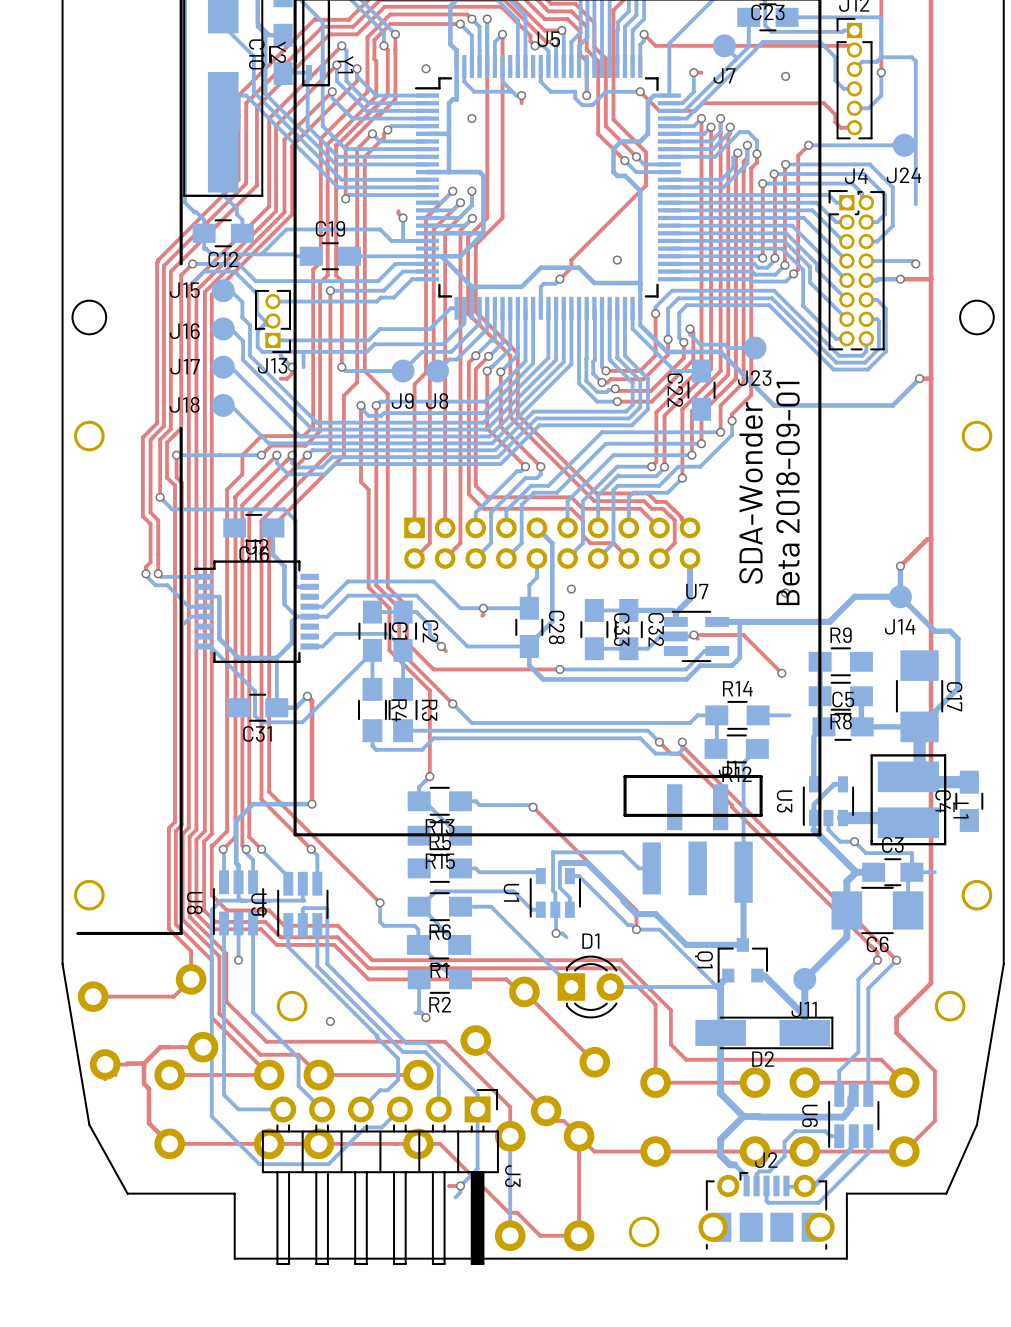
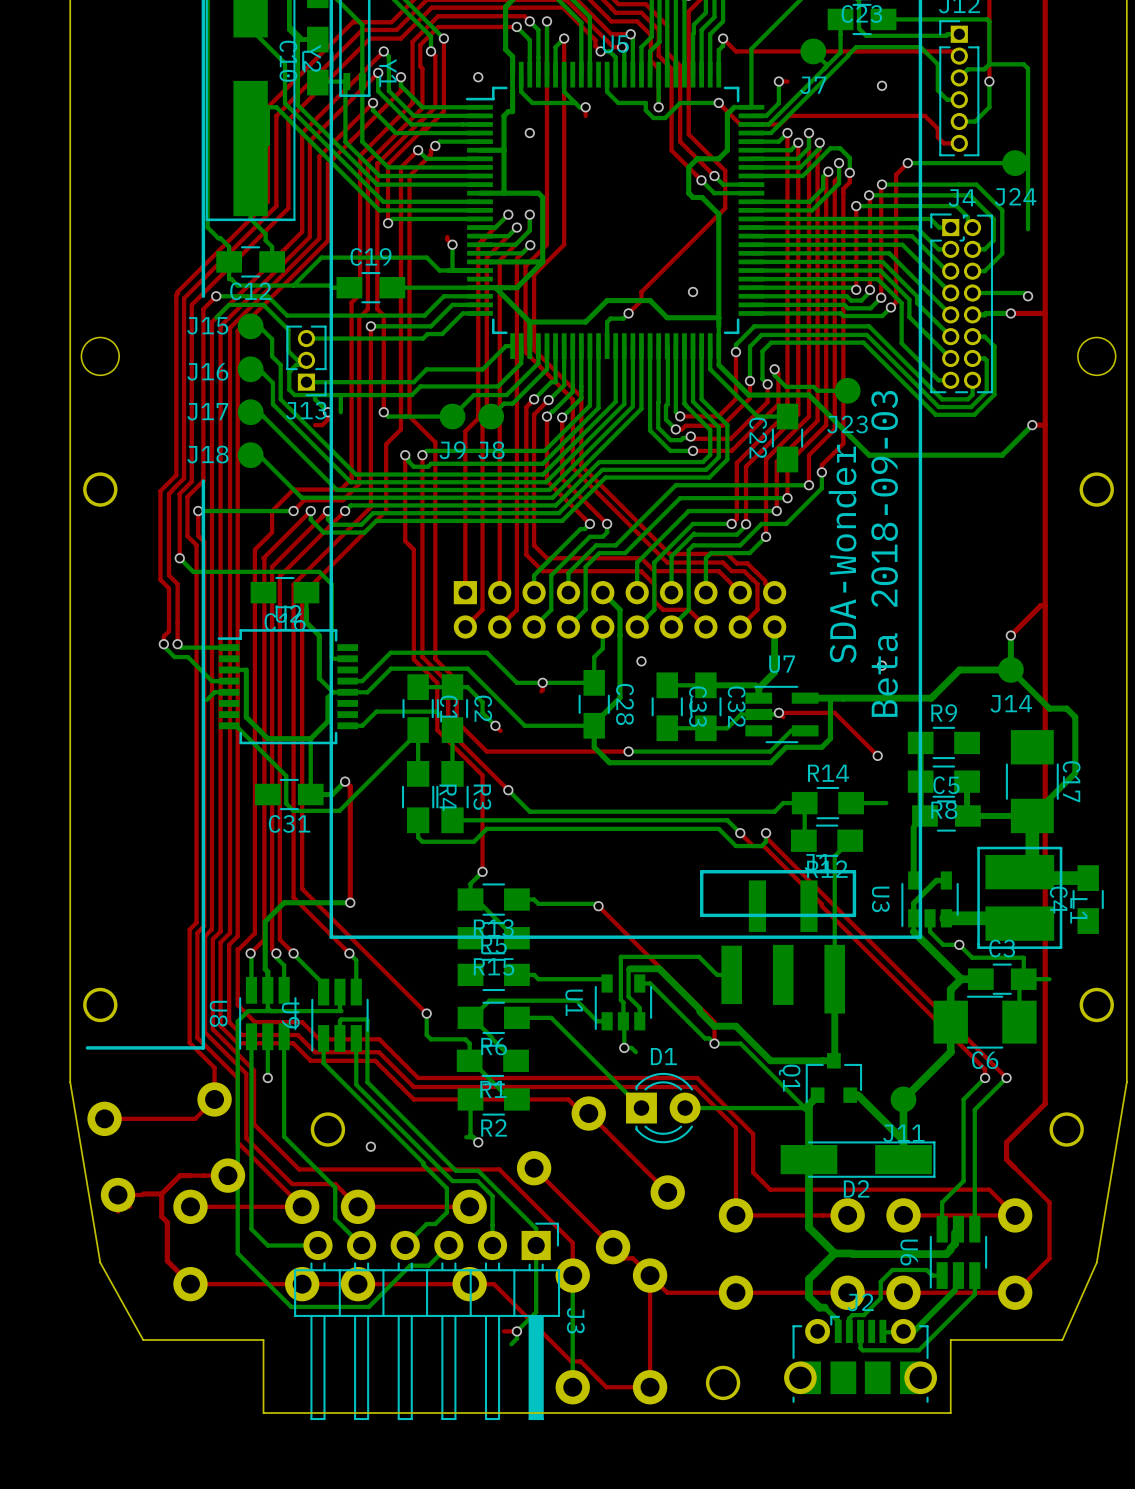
text: Beta 2018-09-01 (787, 493) -> Beta 2018-09-03 (884, 553)

